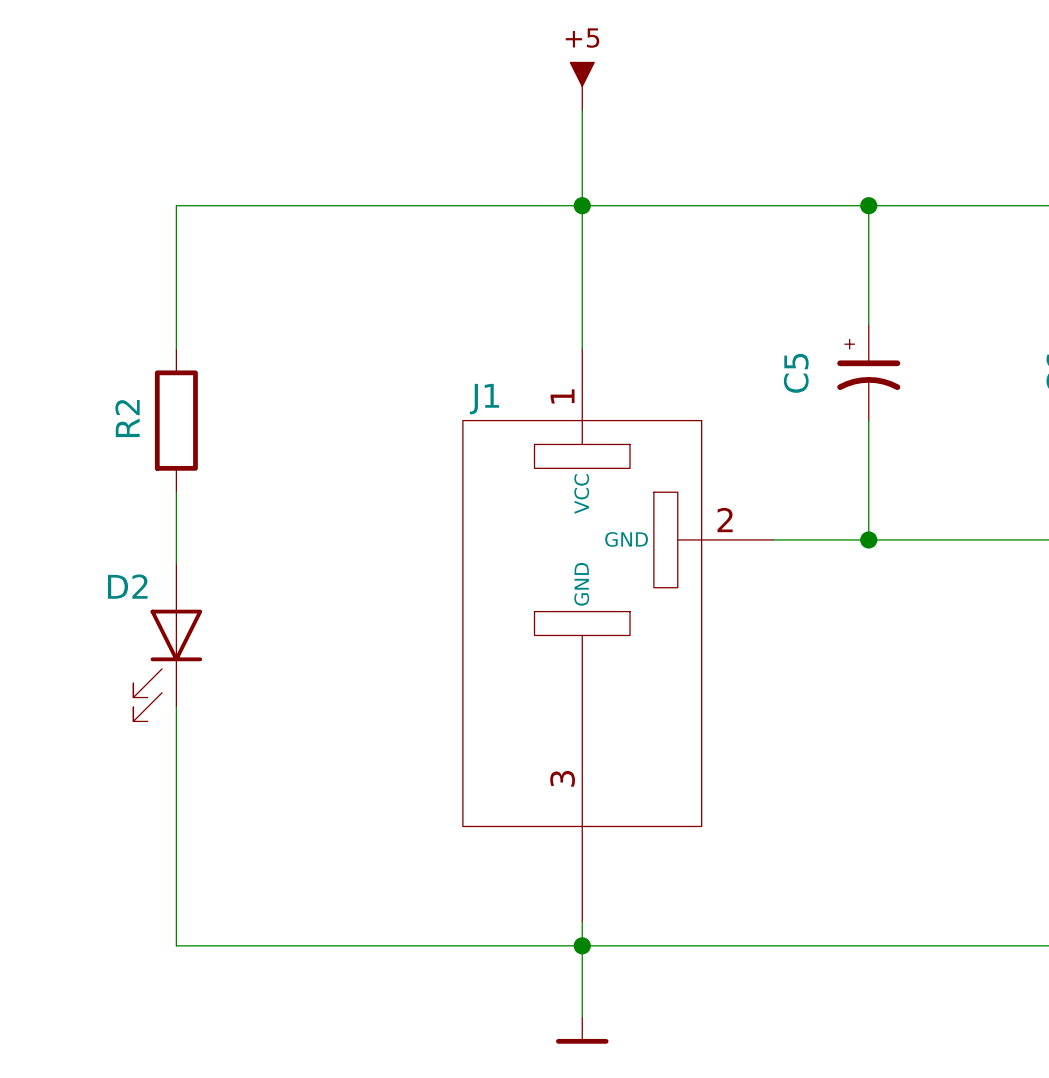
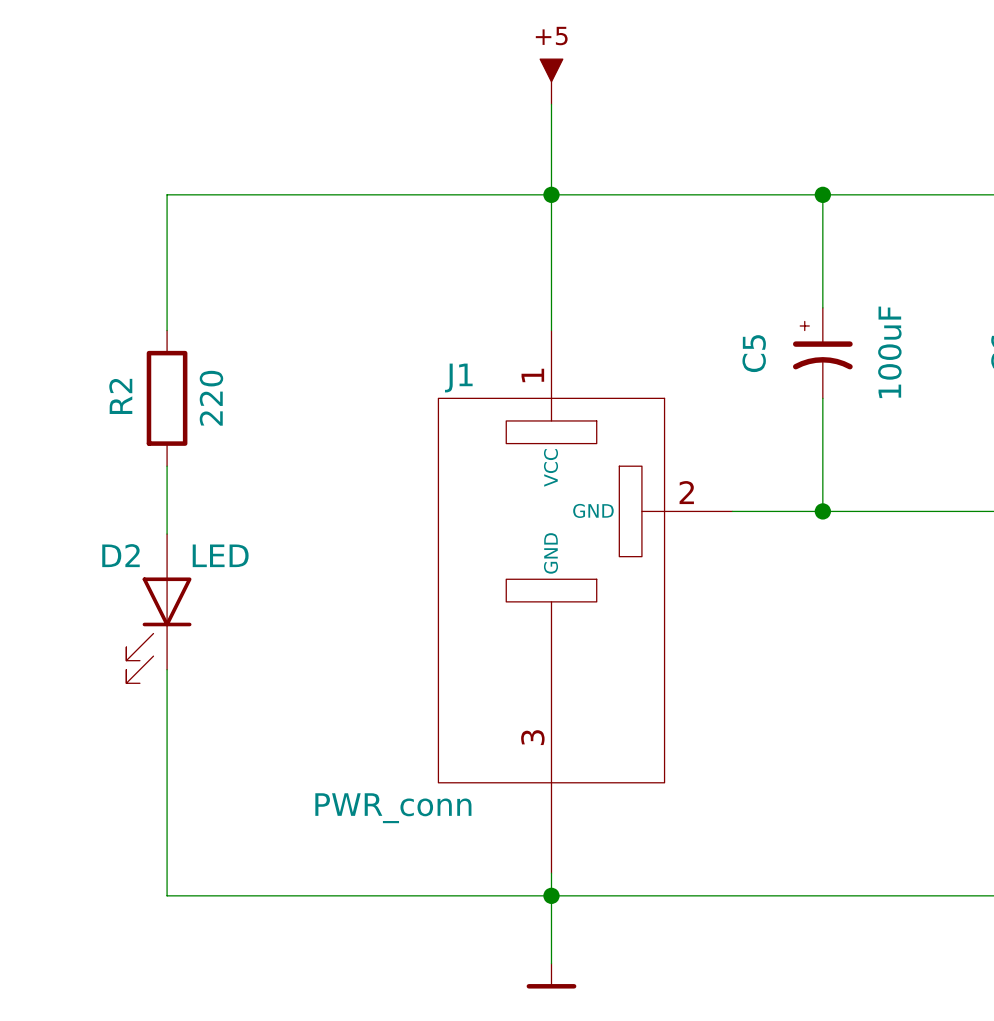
C5 value: none -> 100uF (889, 352)
R2 value: none -> 220 (211, 398)
D2 value: none -> LED (220, 555)
J1 value: none -> PWR_conn (393, 808)

